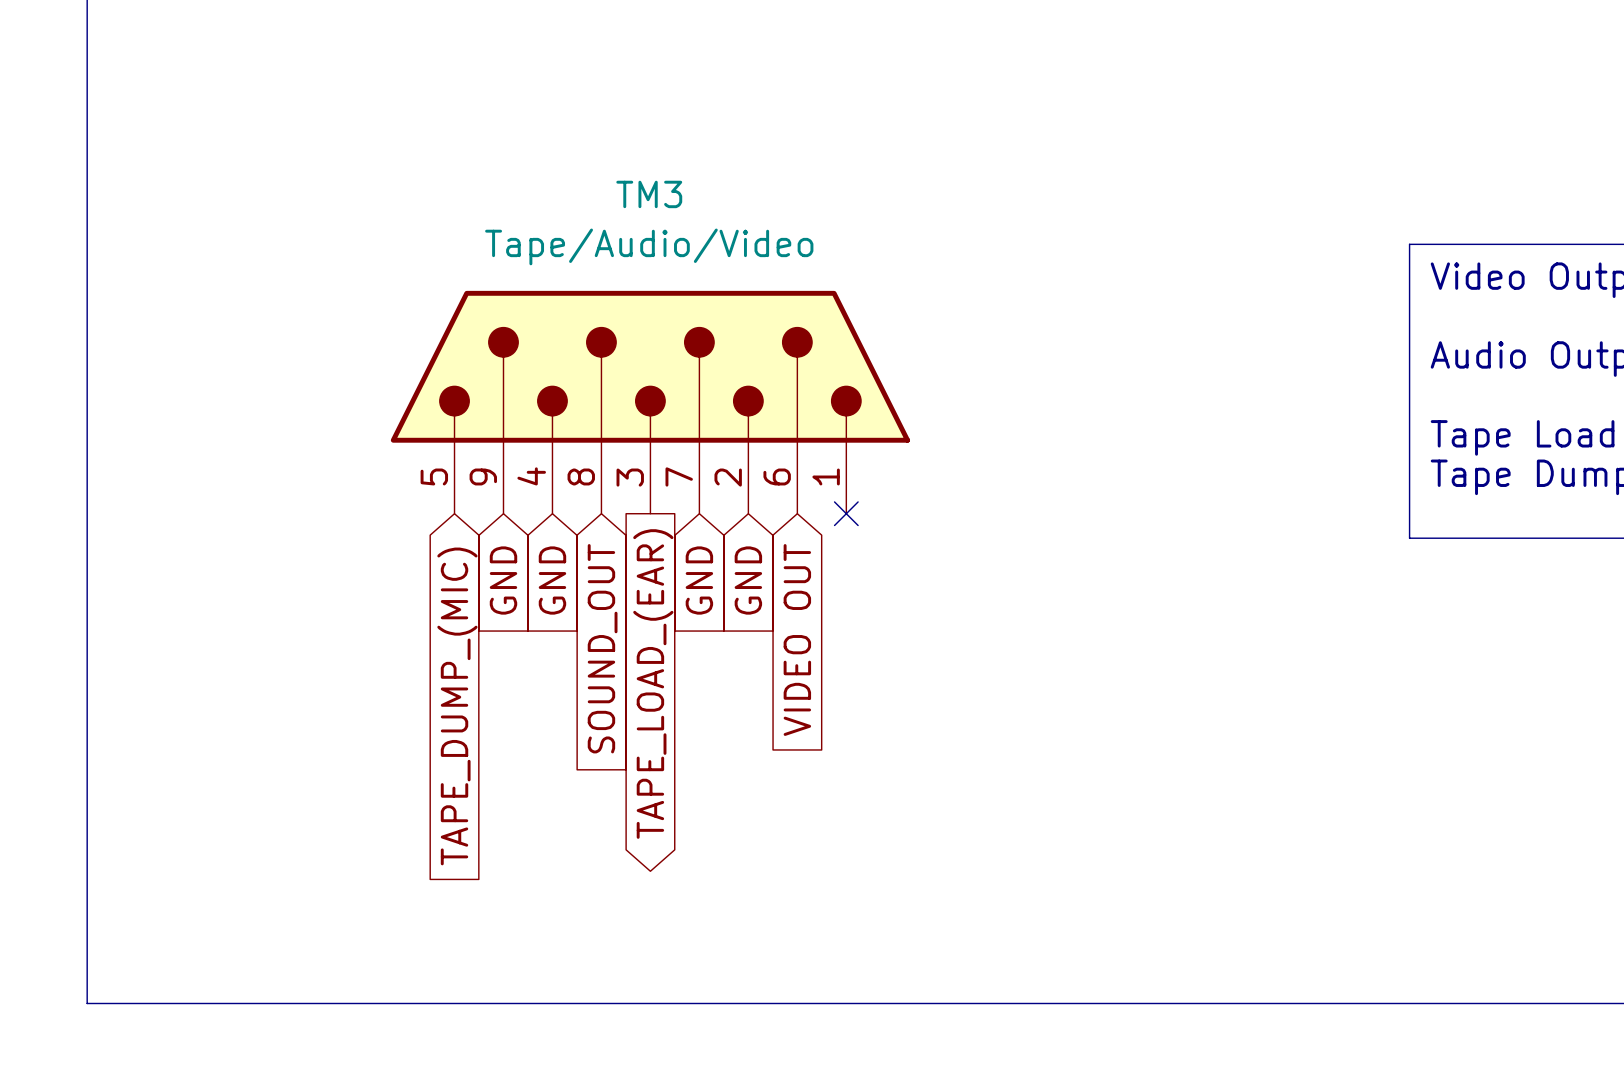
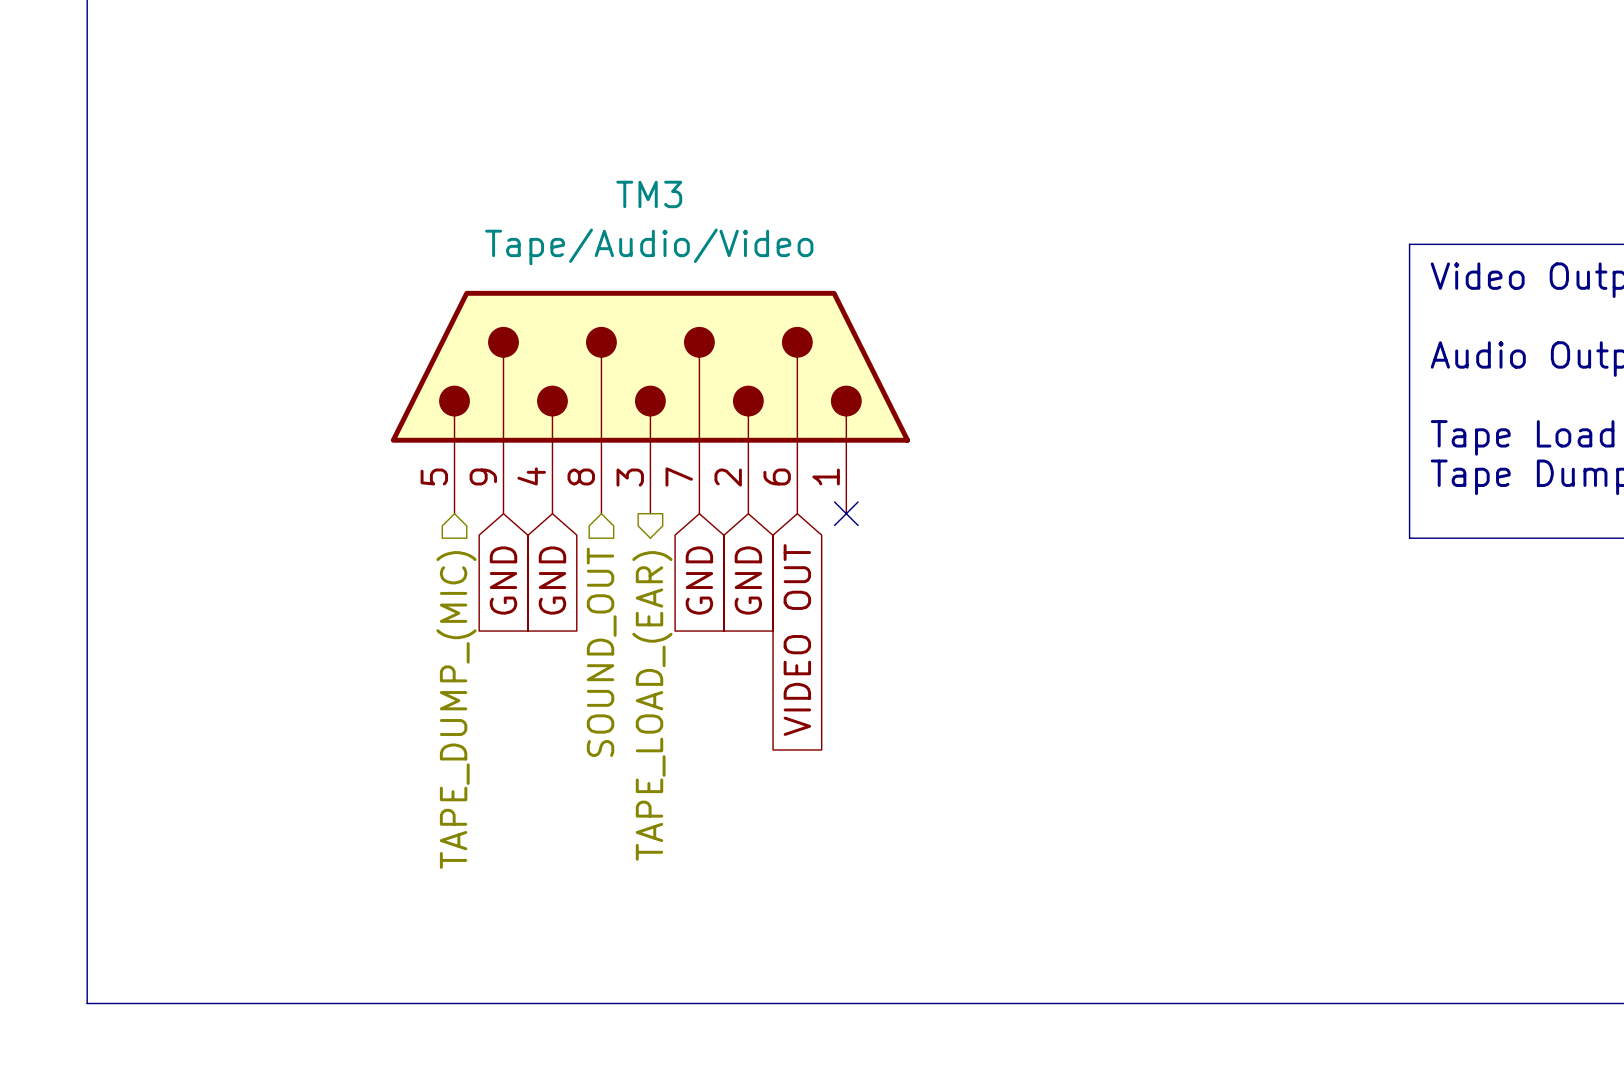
global label: SOUND_OUT (602, 648) -> none
hierarchical label: none -> SOUND_OUT (601, 652)
global label: TAPE_LOAD_(EAR) (653, 684) -> none
hierarchical label: none -> TAPE_LOAD_(EAR) (652, 705)
global label: TAPE_DUMP_(MIC) (457, 706) -> none
hierarchical label: none -> TAPE_DUMP_(MIC) (456, 710)

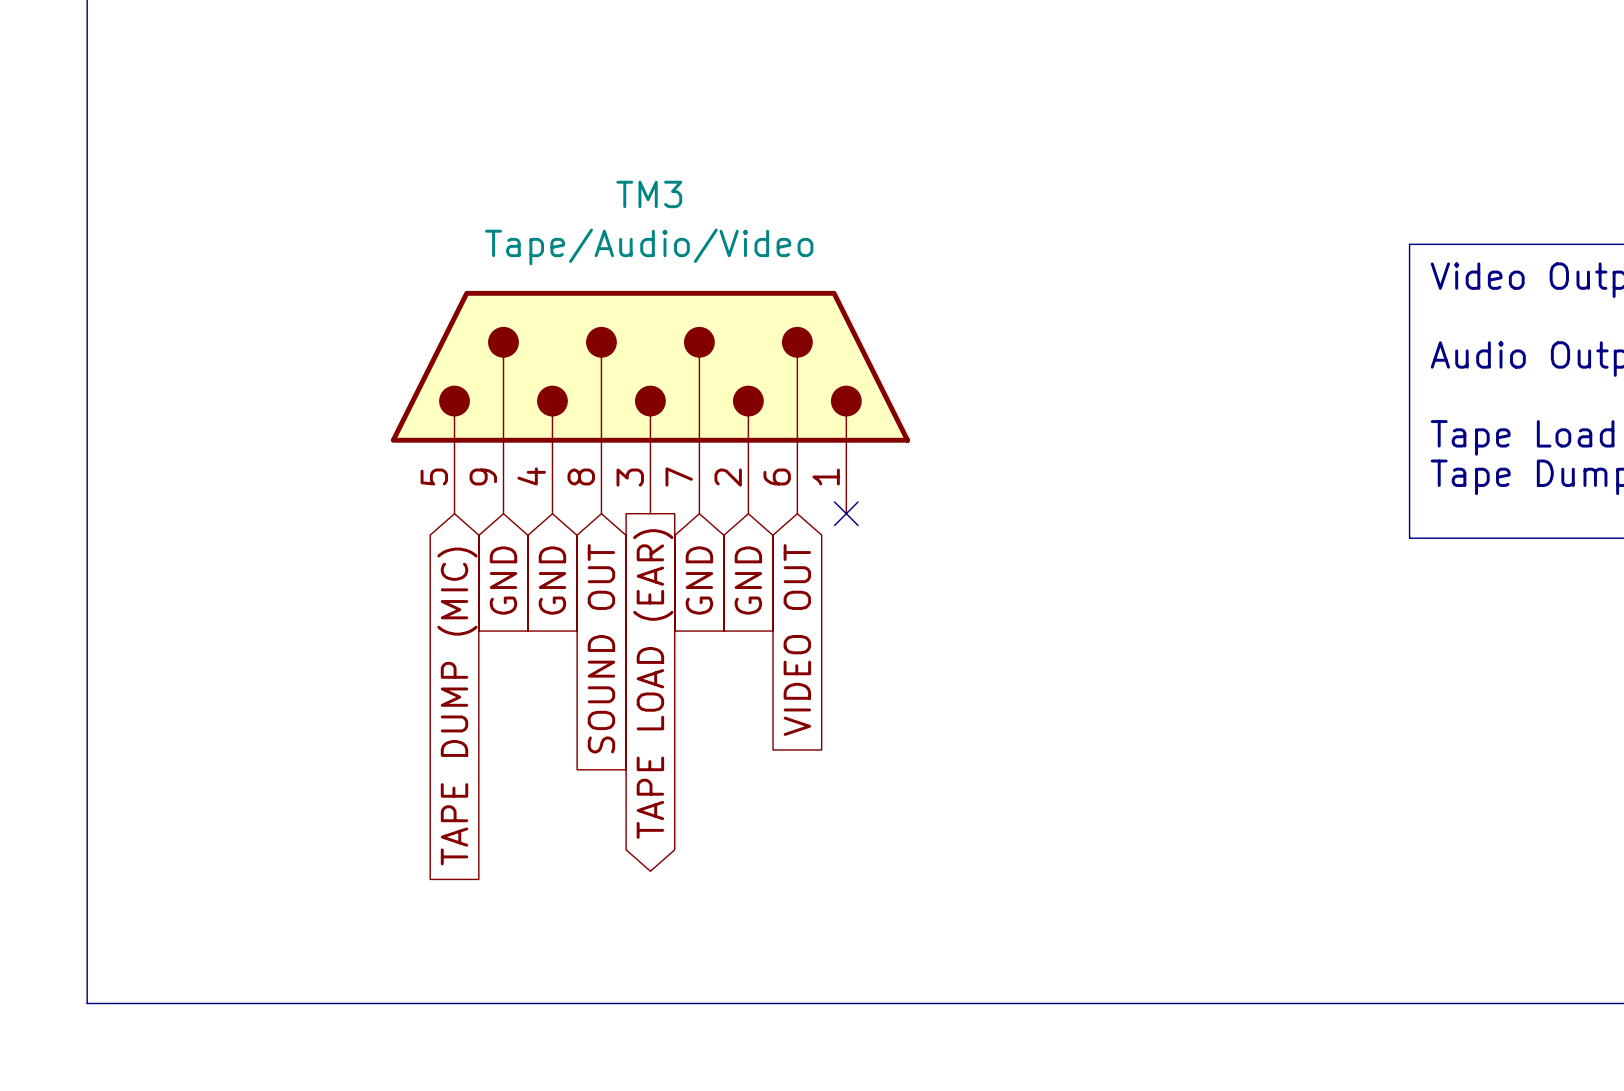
global label: none -> SOUND OUT (601, 648)
hierarchical label: SOUND_OUT (601, 652) -> none
global label: none -> TAPE LOAD (EAR) (653, 684)
hierarchical label: TAPE_LOAD_(EAR) (652, 705) -> none
global label: none -> TAPE DUMP (MIC) (457, 706)
hierarchical label: TAPE_DUMP_(MIC) (456, 710) -> none

